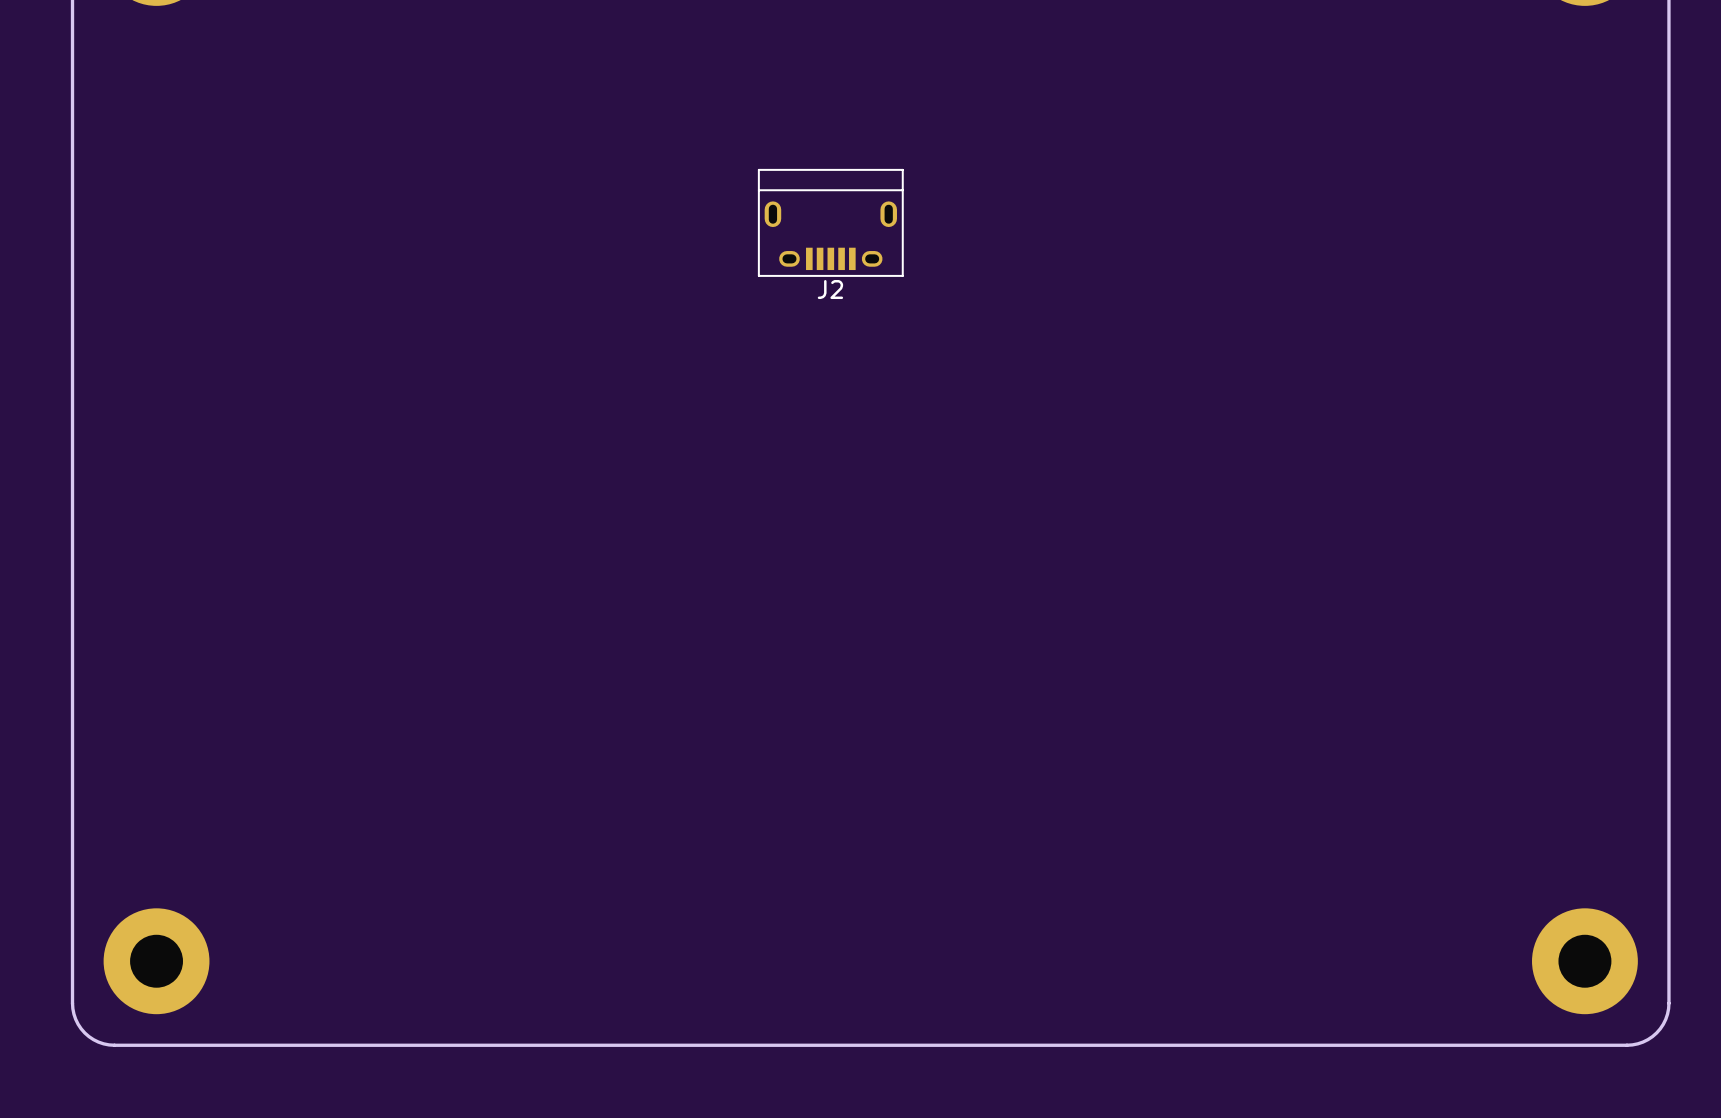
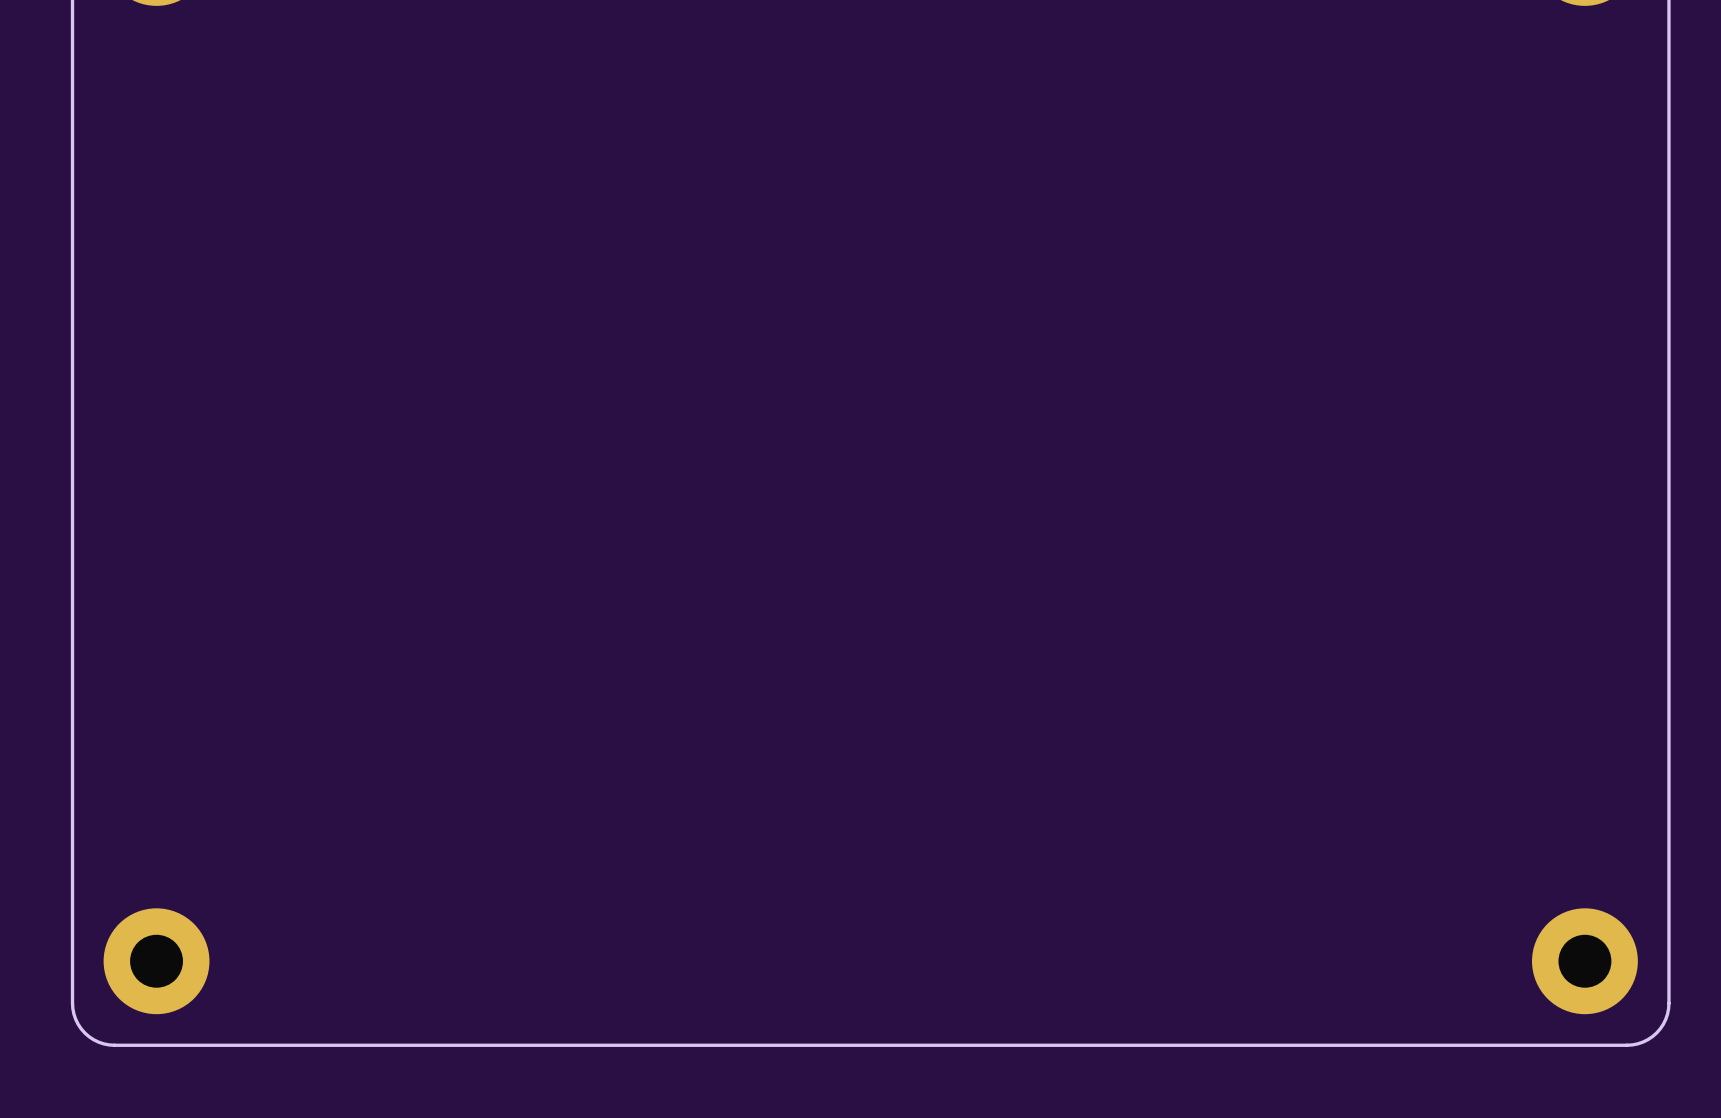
J2: (830, 222) -> none

